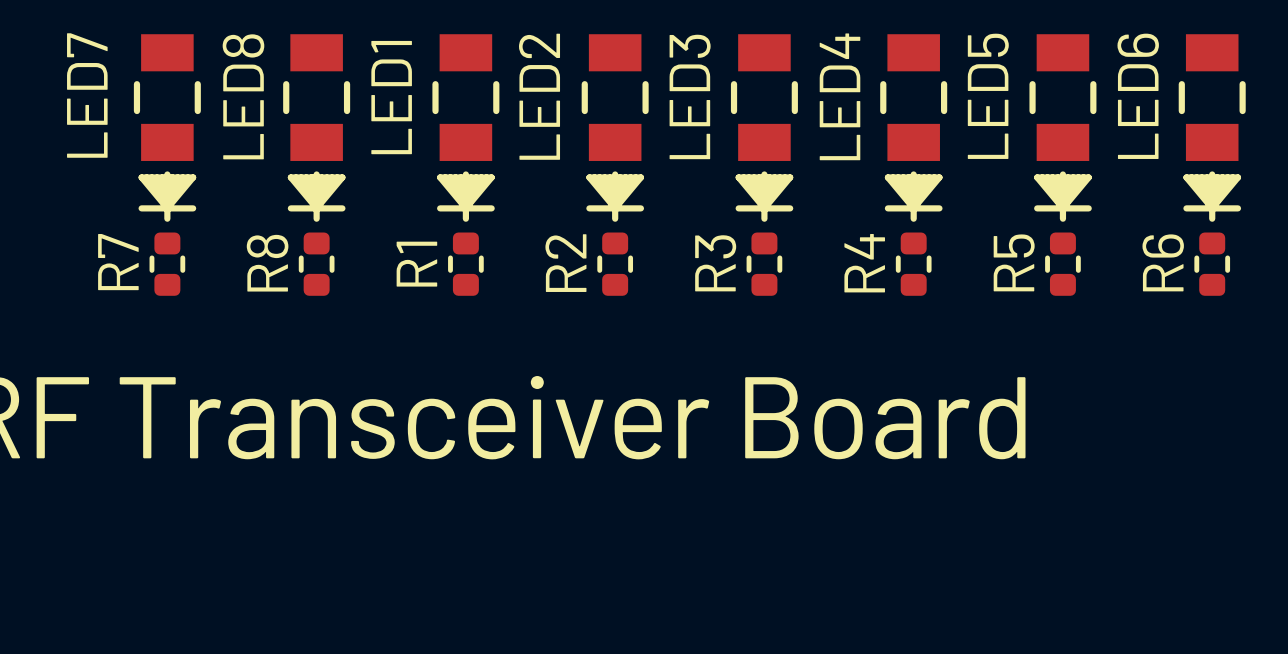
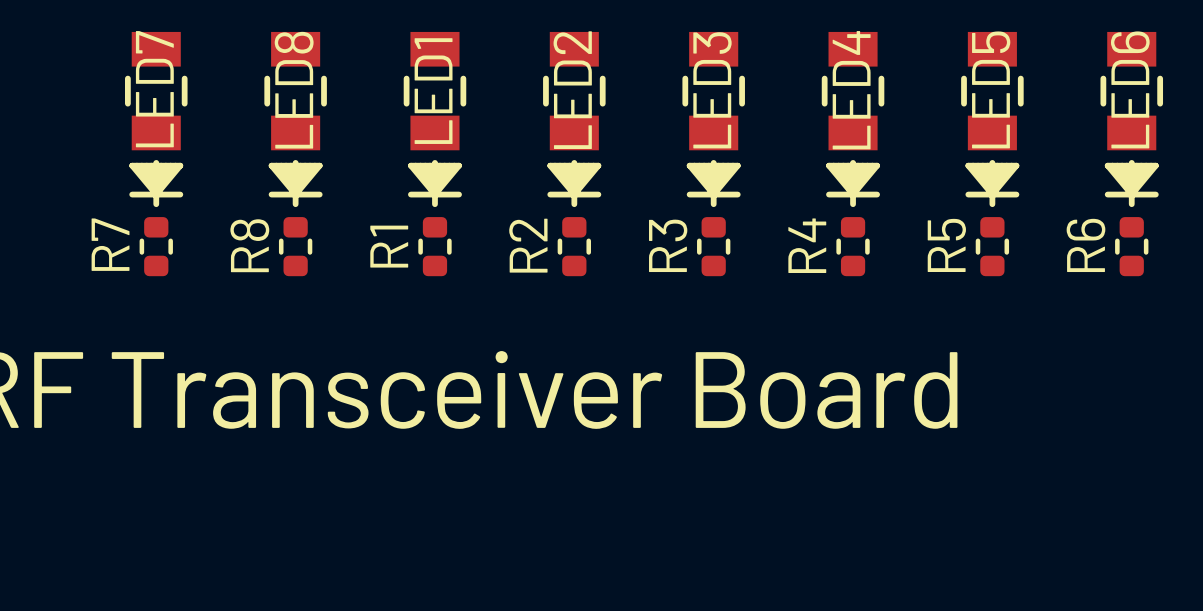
LED7 name position: LED7 (87, 95) -> LED7 (154, 89)
LED8 name position: LED8 (243, 96) -> LED8 (294, 90)
LED2 name position: LED2 (539, 96) -> LED2 (572, 90)
LED3 name position: LED3 (690, 96) -> LED3 (712, 90)
LED4 name position: LED4 (840, 96) -> LED4 (851, 90)
LED5 name position: LED5 (988, 96) -> LED5 (991, 89)
LED6 name position: LED6 (1138, 96) -> LED6 (1130, 89)
LED1 name position: LED1 (391, 97) -> LED1 (433, 91)

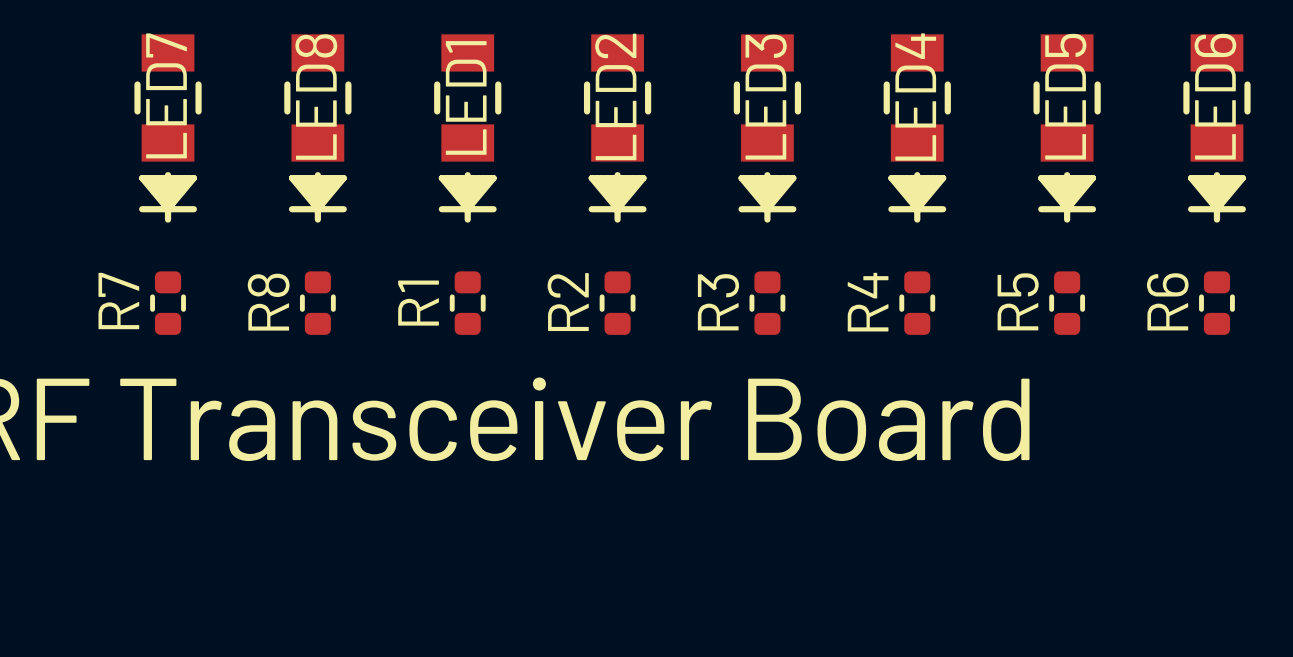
R7 position: (156, 246) -> (168, 303)
R8 position: (295, 246) -> (317, 303)
R1 position: (434, 246) -> (467, 303)
R2 position: (574, 246) -> (617, 303)
R3 position: (713, 246) -> (767, 303)
R4 position: (853, 246) -> (917, 303)
R5 position: (992, 246) -> (1067, 303)
R6 position: (1131, 246) -> (1216, 303)

